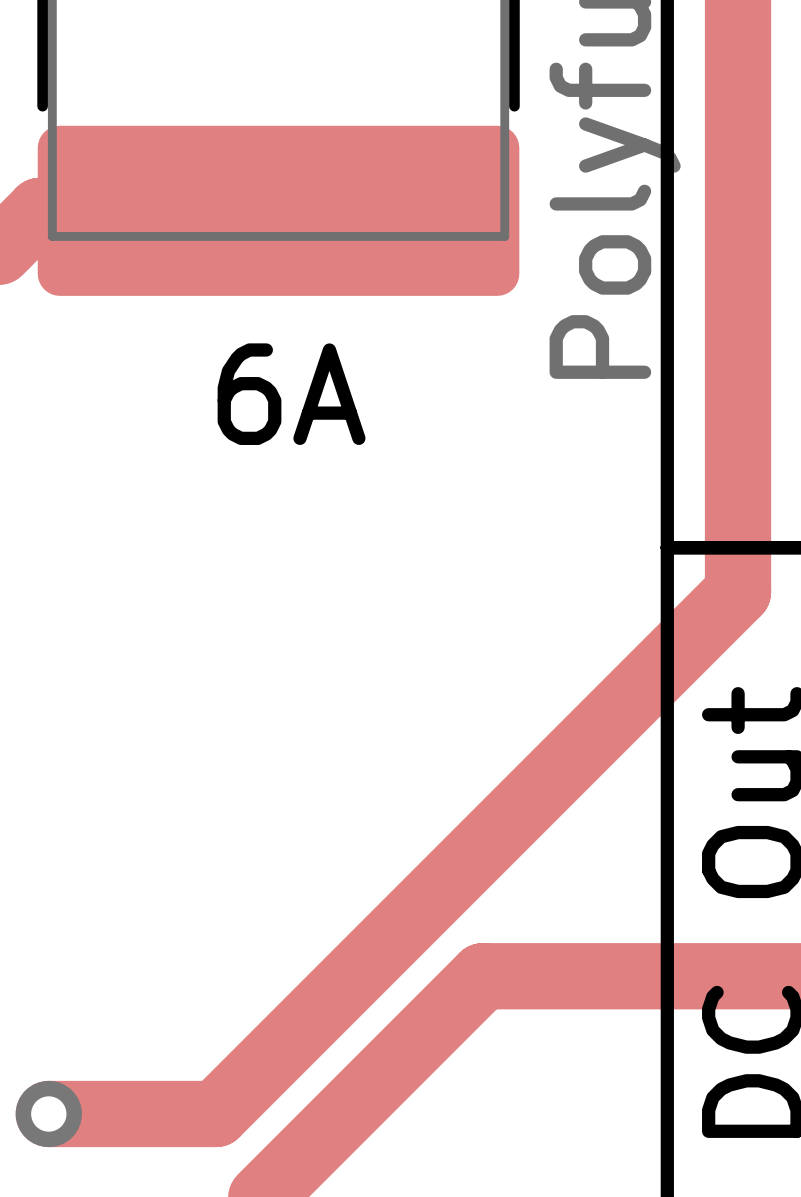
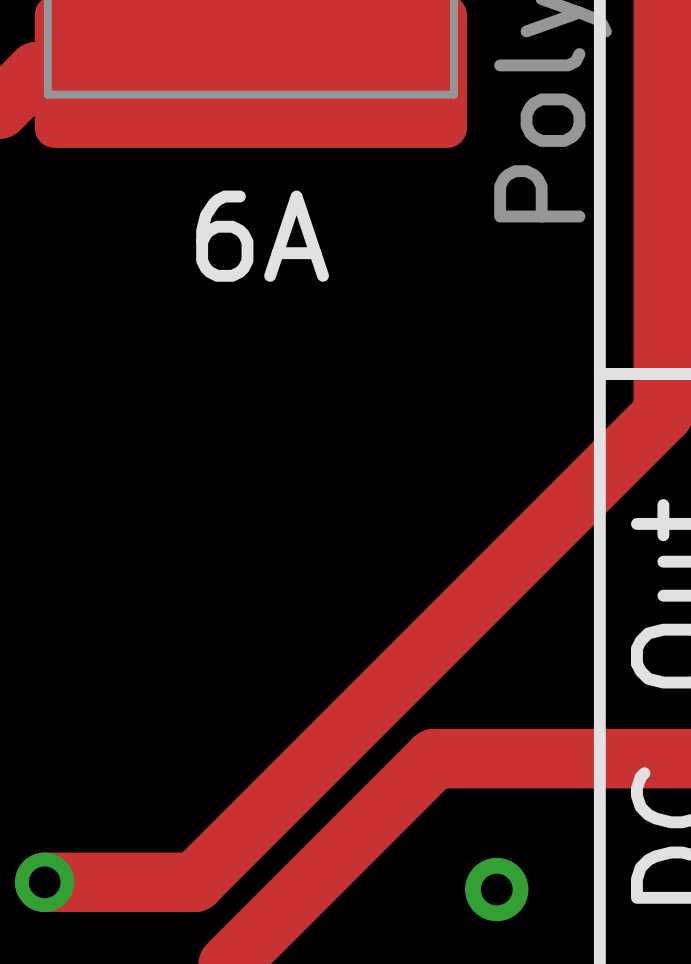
via: none -> (496, 889)

